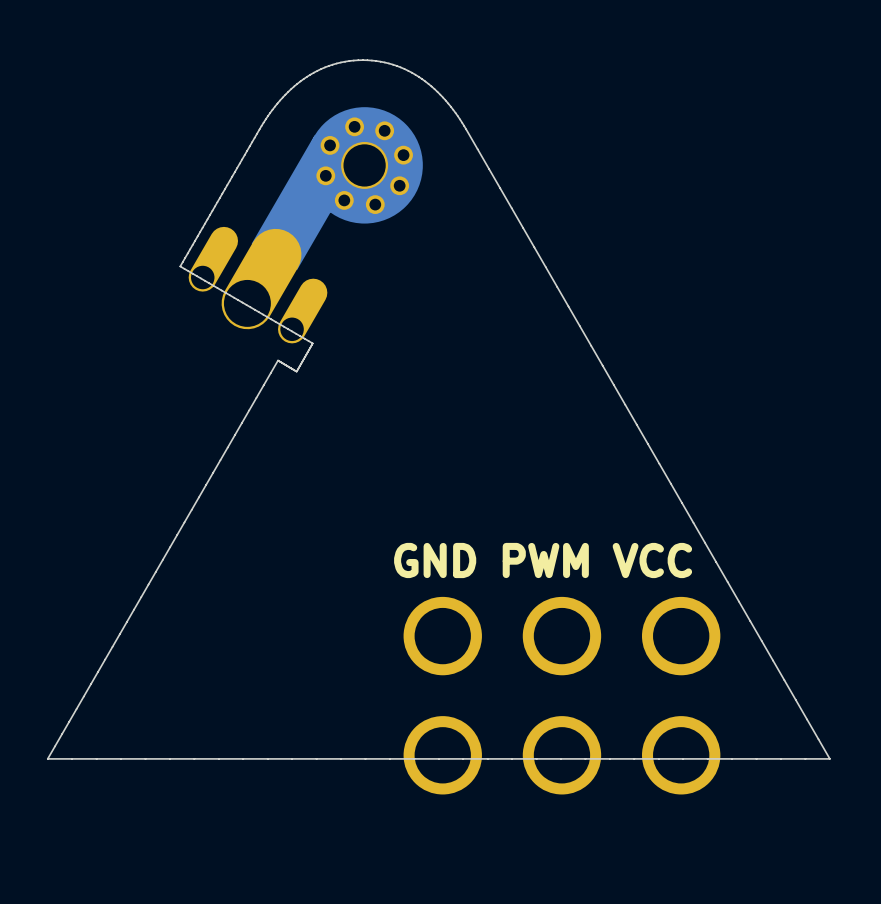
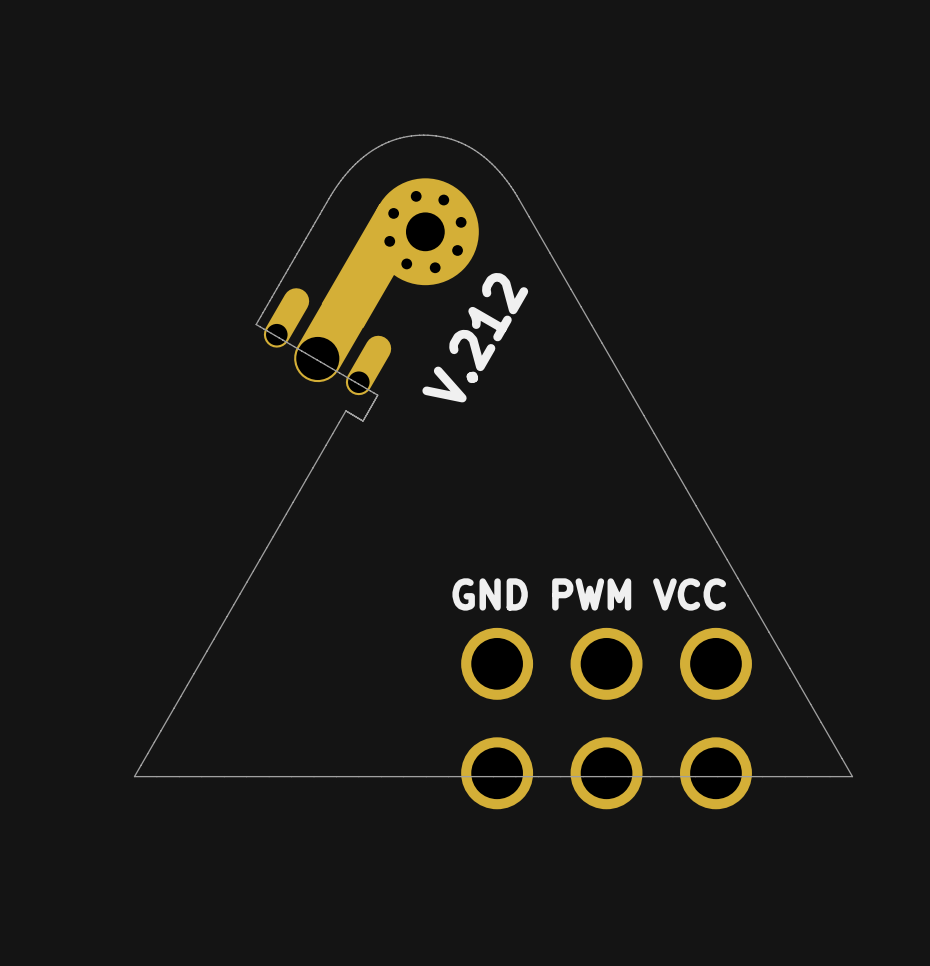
text: none -> V.212 (475, 337)

